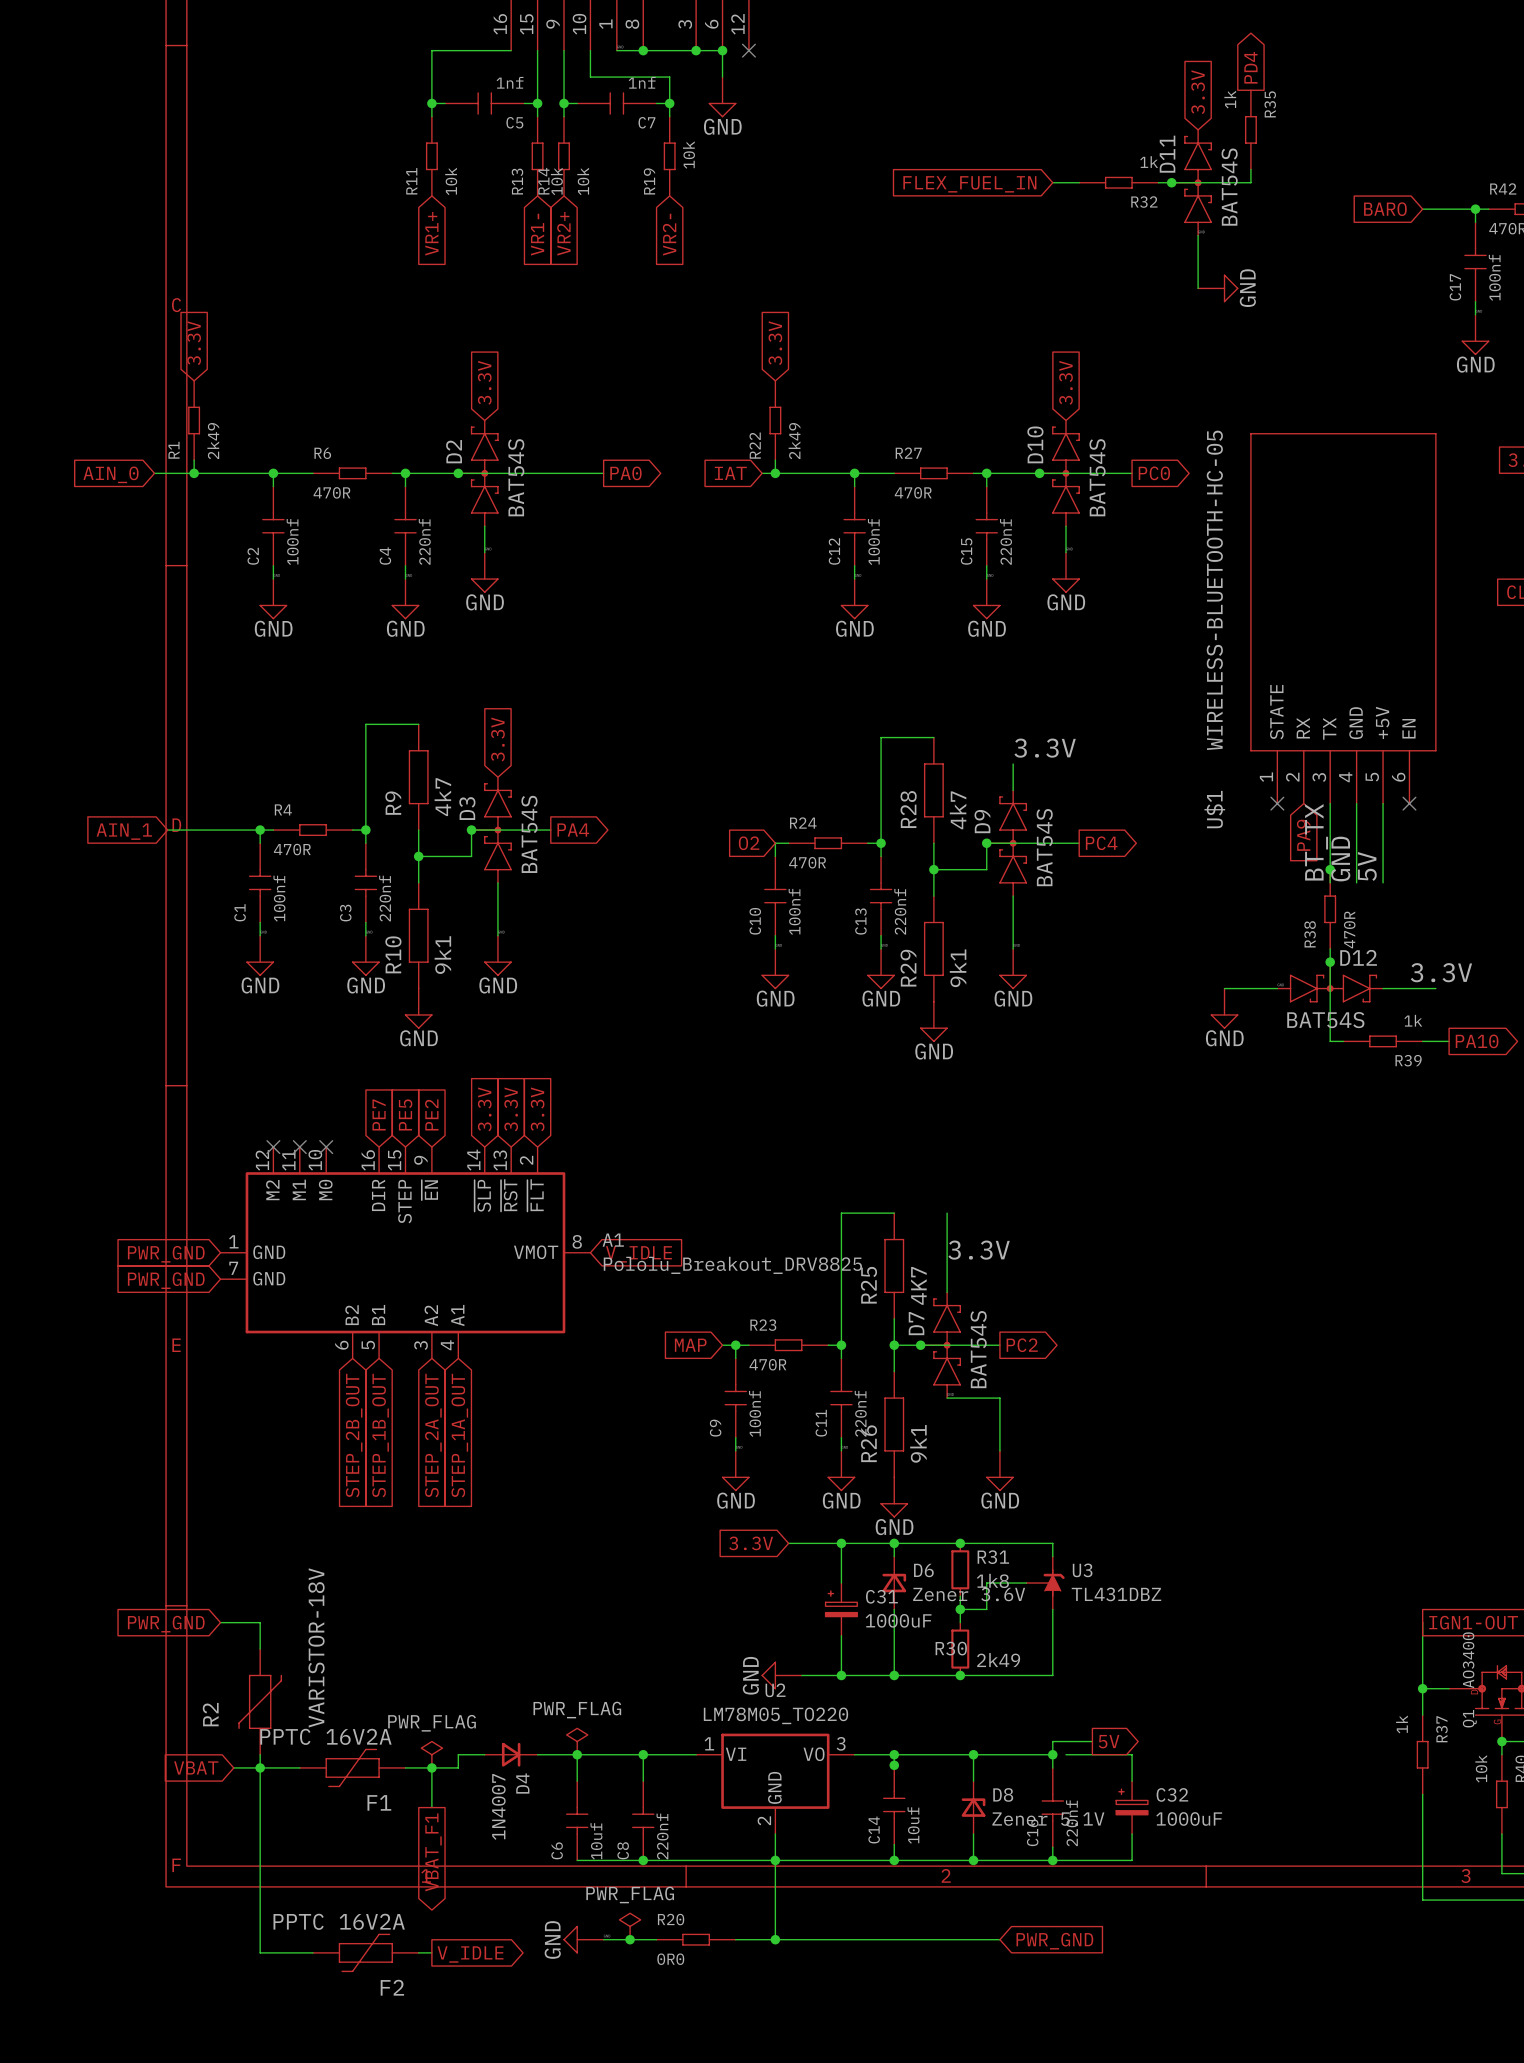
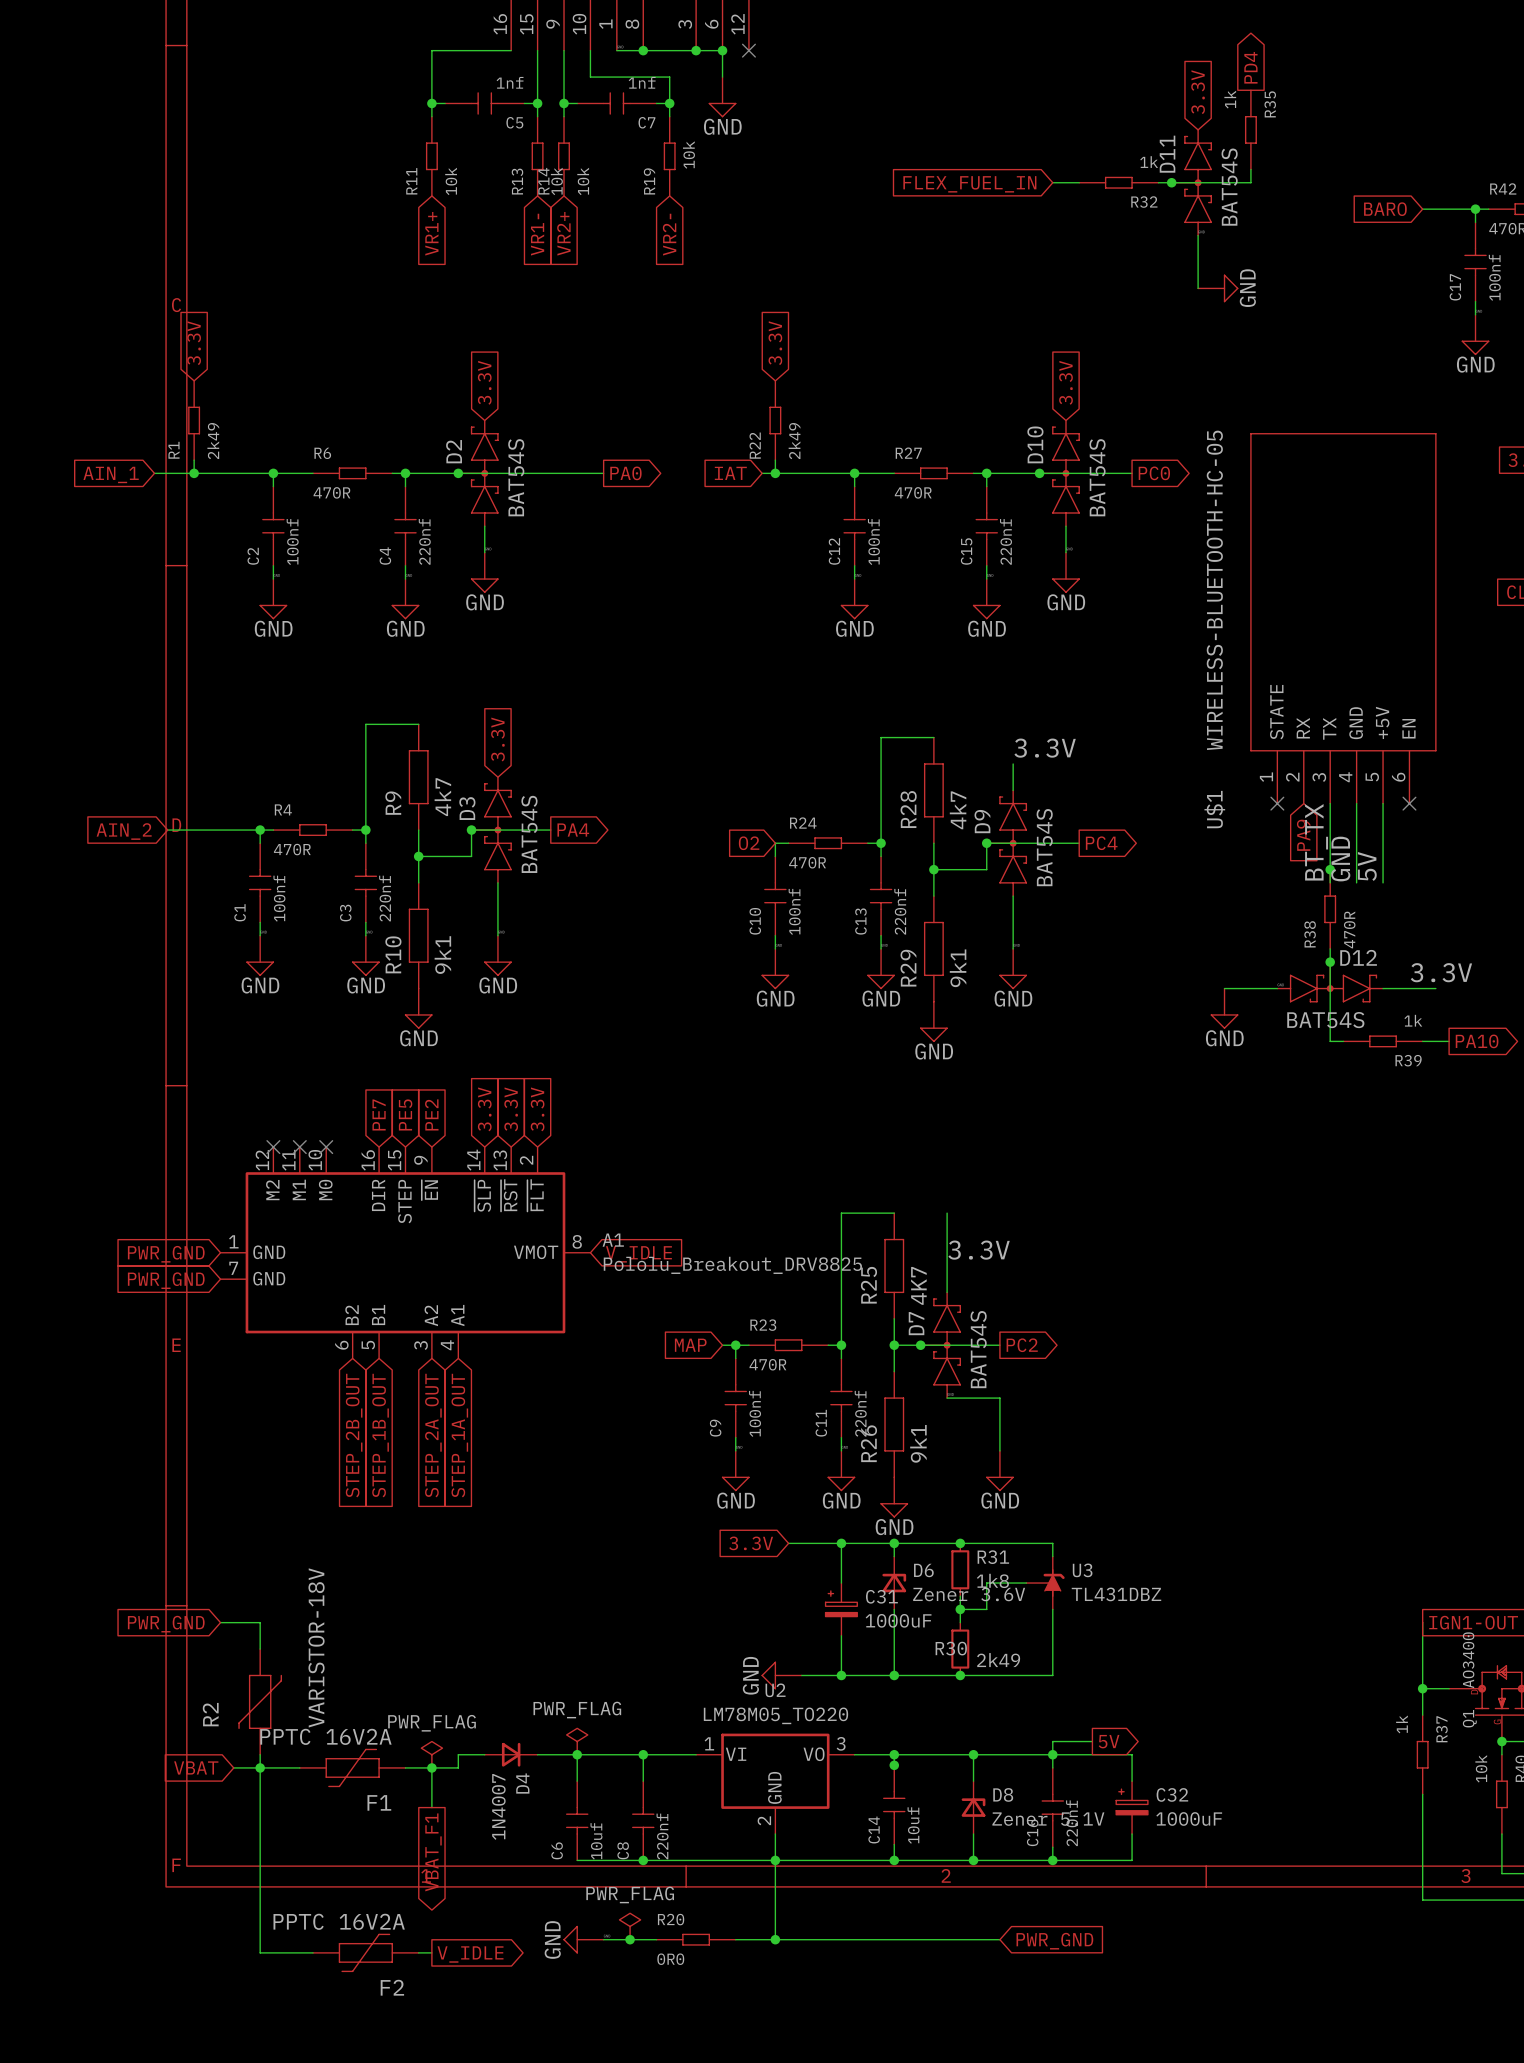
global label: AIN_0 (111, 474) -> AIN_1 (111, 474)
global label: AIN_1 (124, 831) -> AIN_2 (124, 831)
wire: none -> (1052, 1754) (1065, 1754)

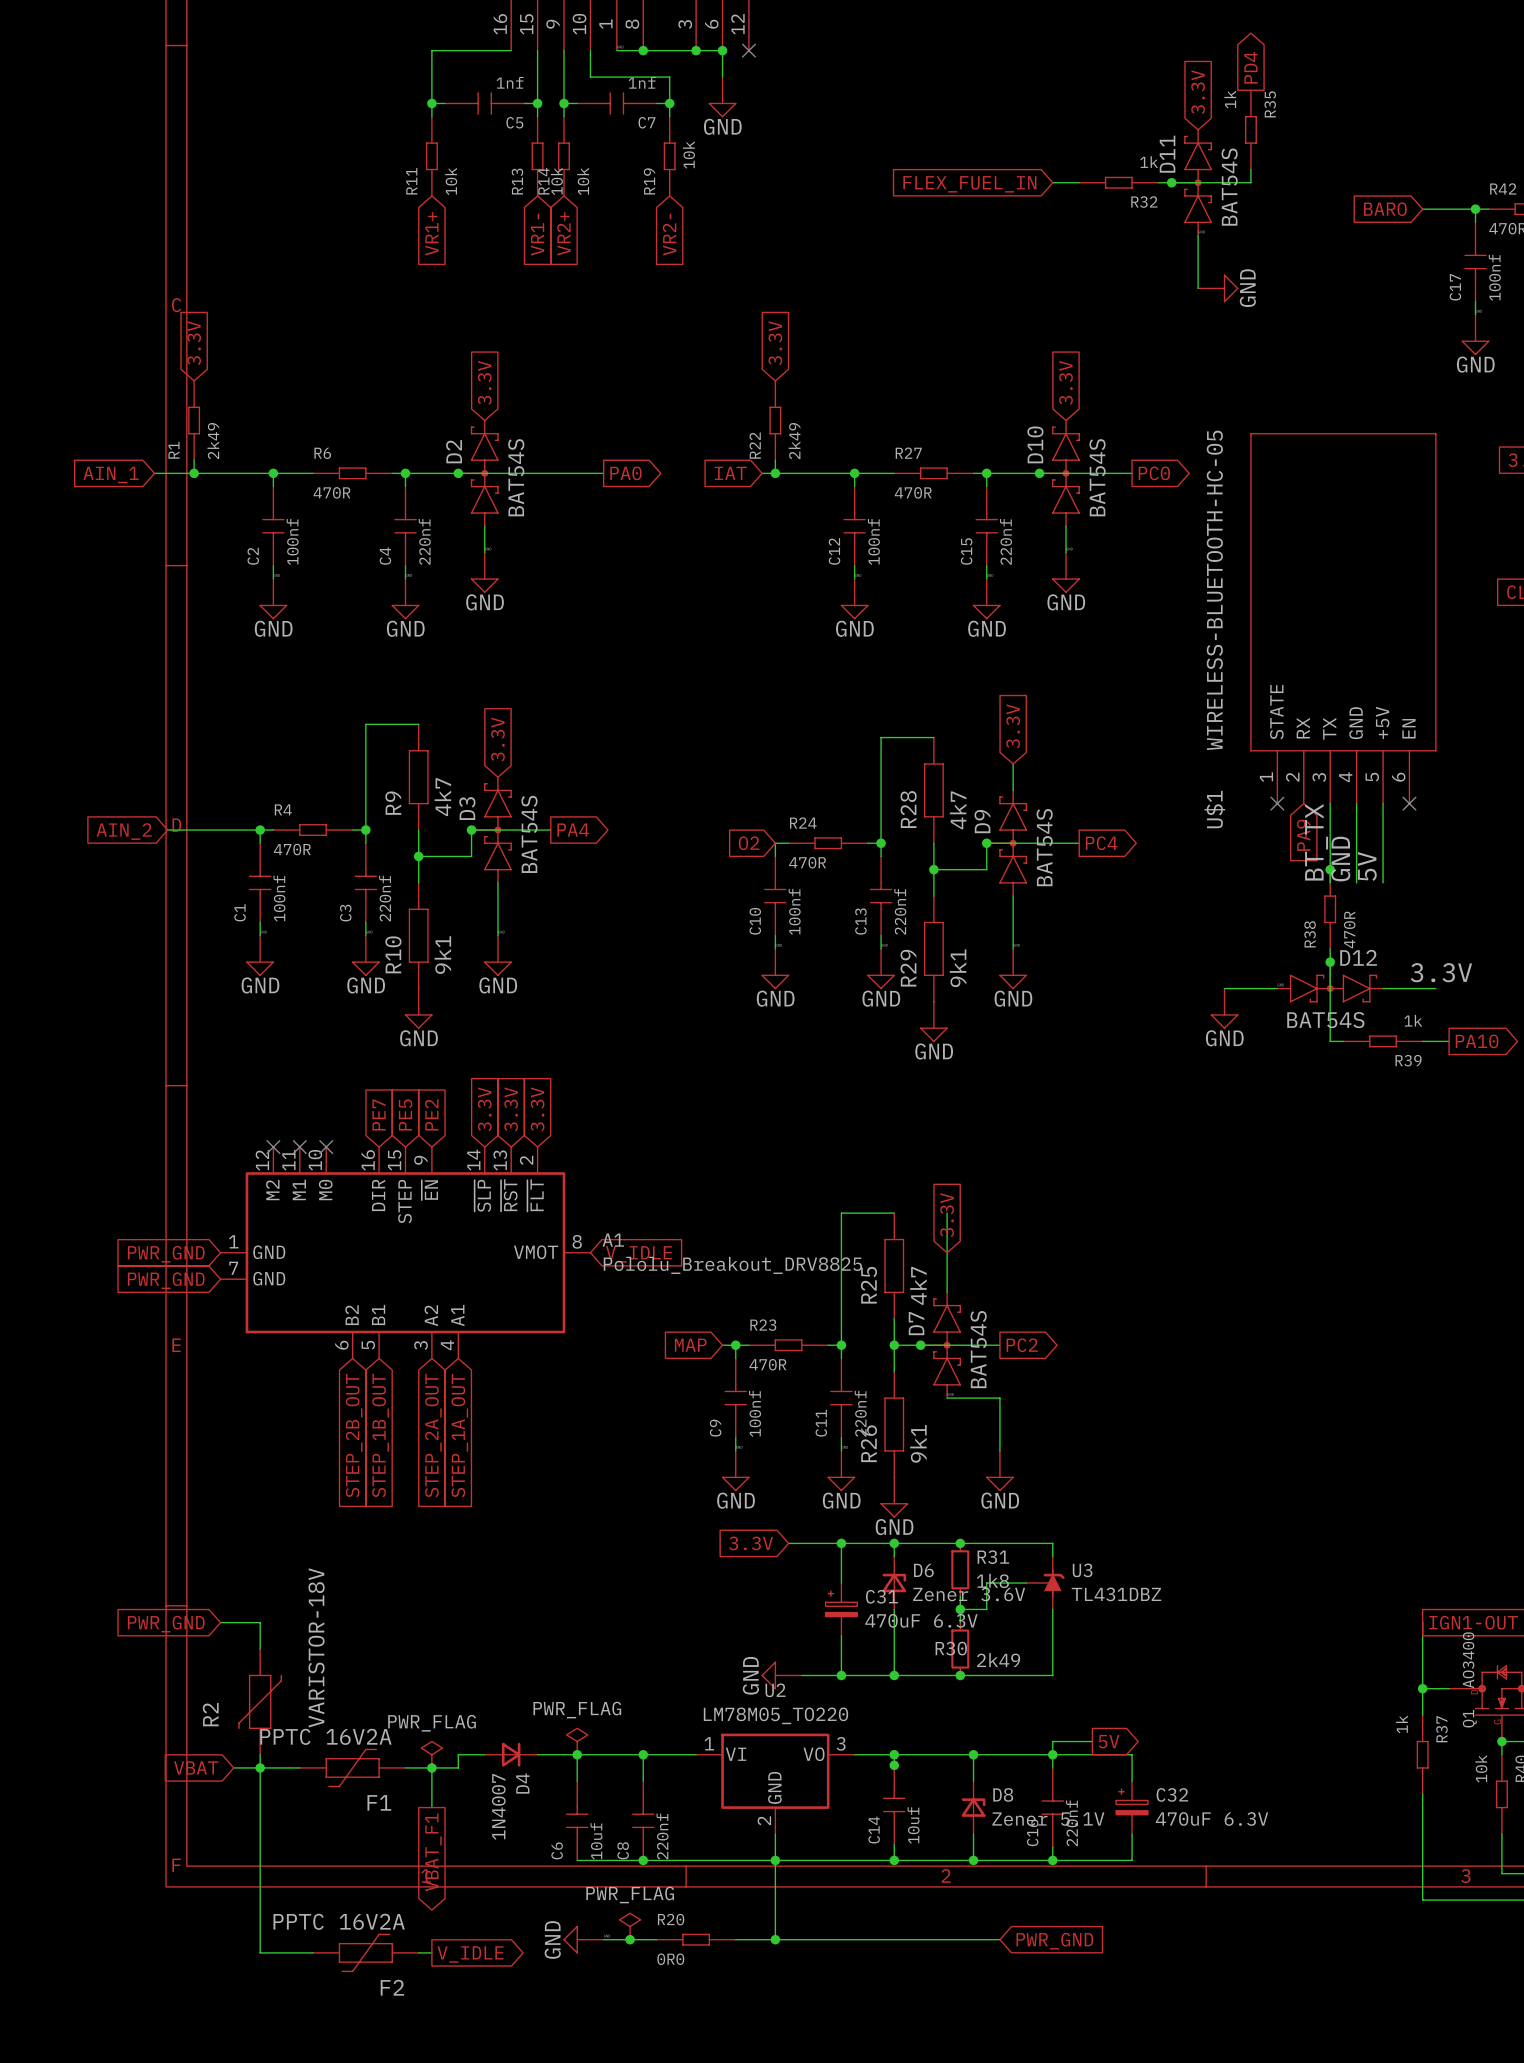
global label: none -> 3.3V (1013, 726)
label: 3.3V (1045, 748) -> none
global label: none -> 3.3V (947, 1215)
label: 3.3V (979, 1250) -> none
R25 value: 4K7 (918, 1285) -> 4k7 (918, 1285)
C31 value: 1000uF (898, 1620) -> 470uF 6.3V (921, 1620)
C32 value: 1000uF (1189, 1818) -> 470uF 6.3V (1212, 1818)

